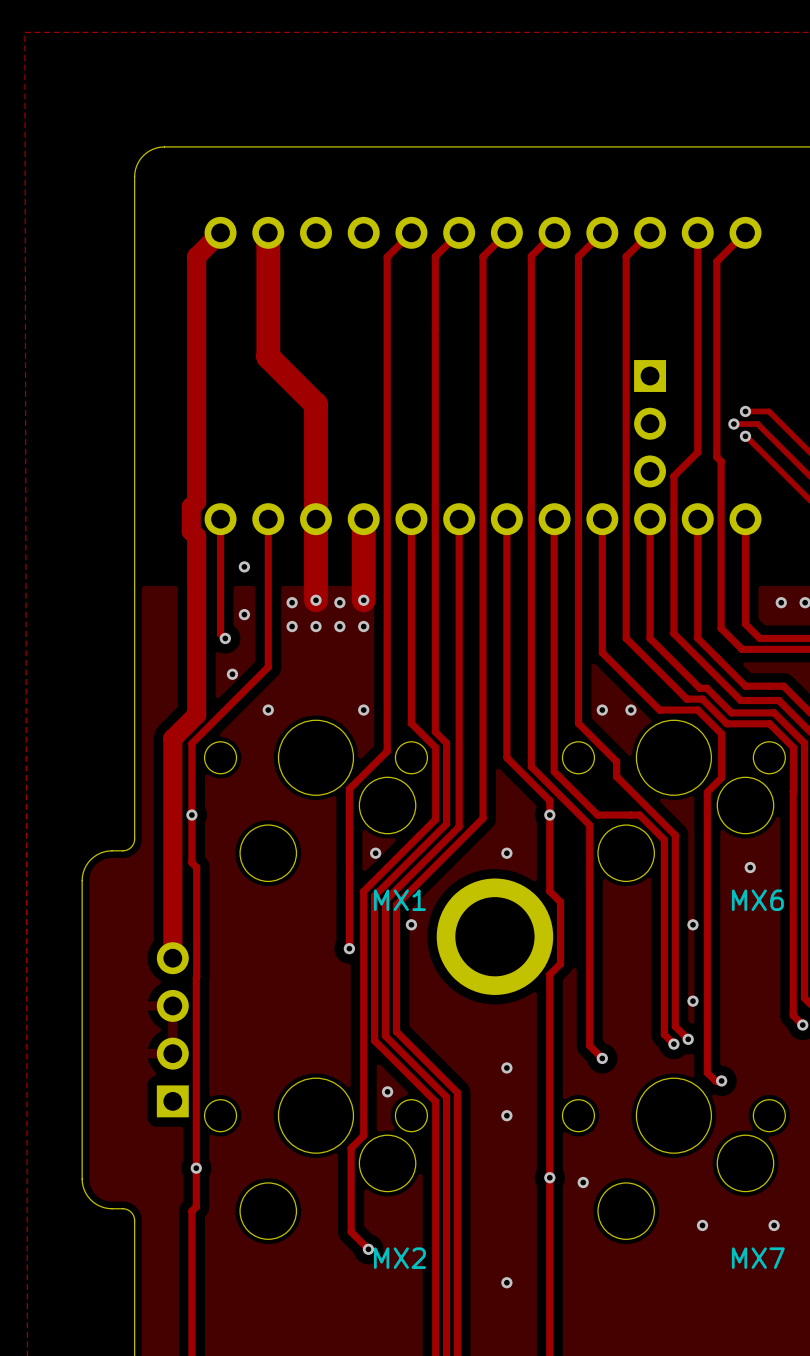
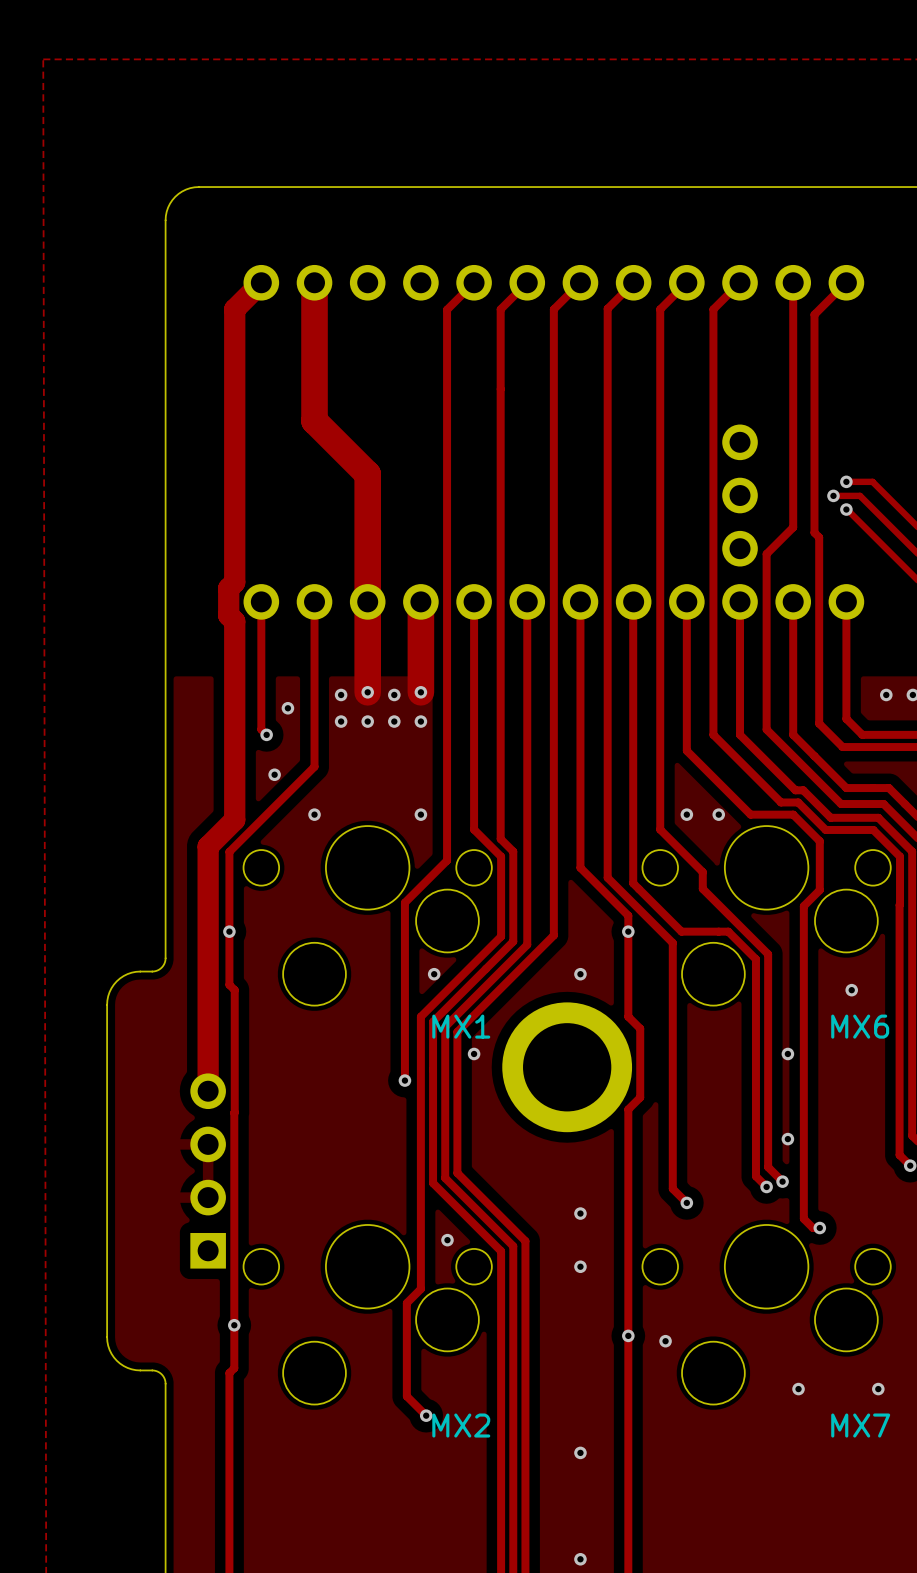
part footprint: [634, 360, 667, 488] -> [722, 424, 758, 567]
via: (244, 566) -> none

